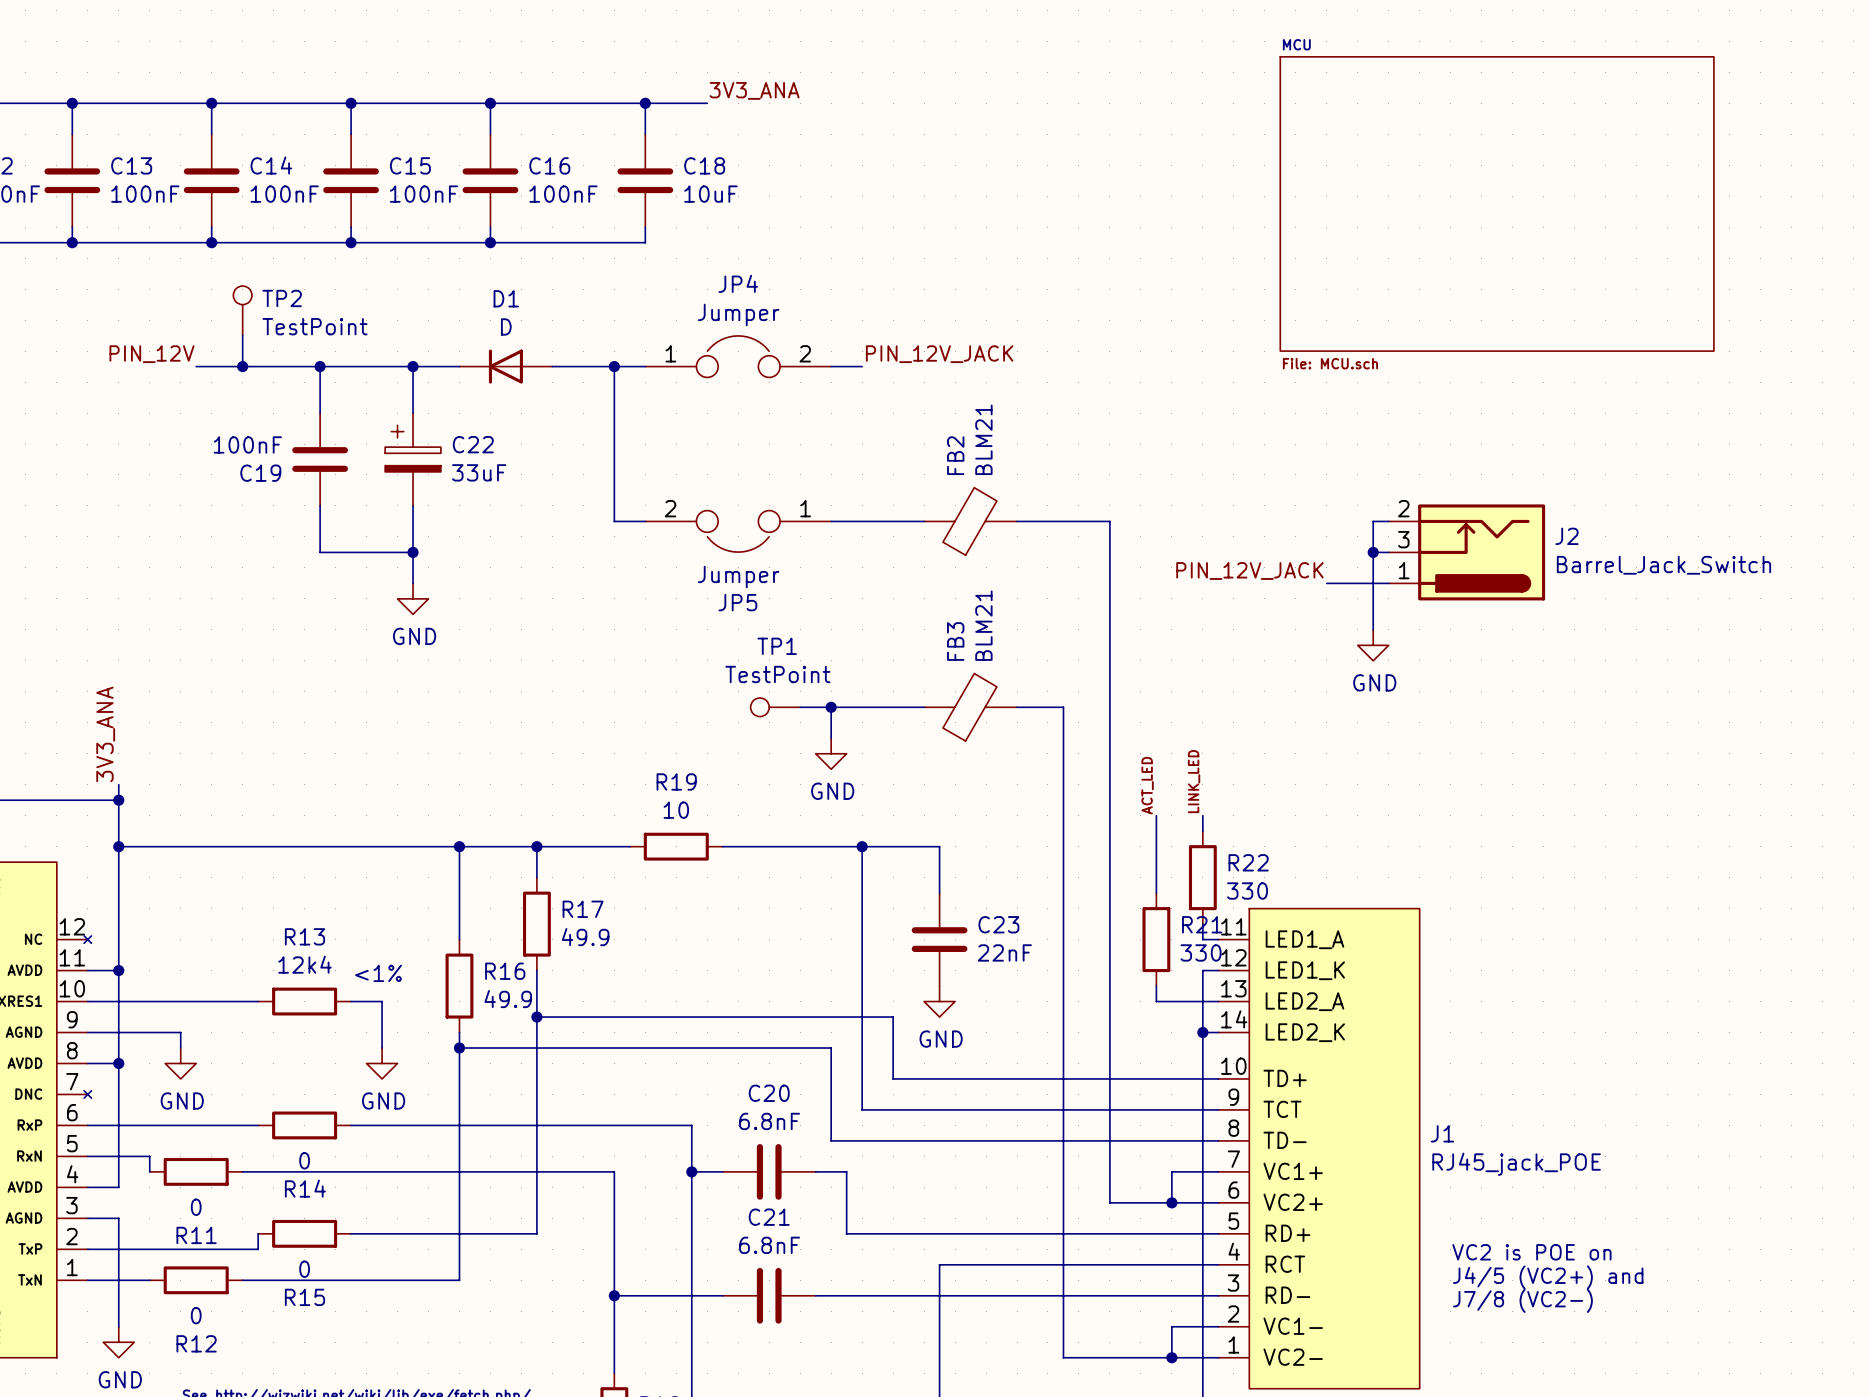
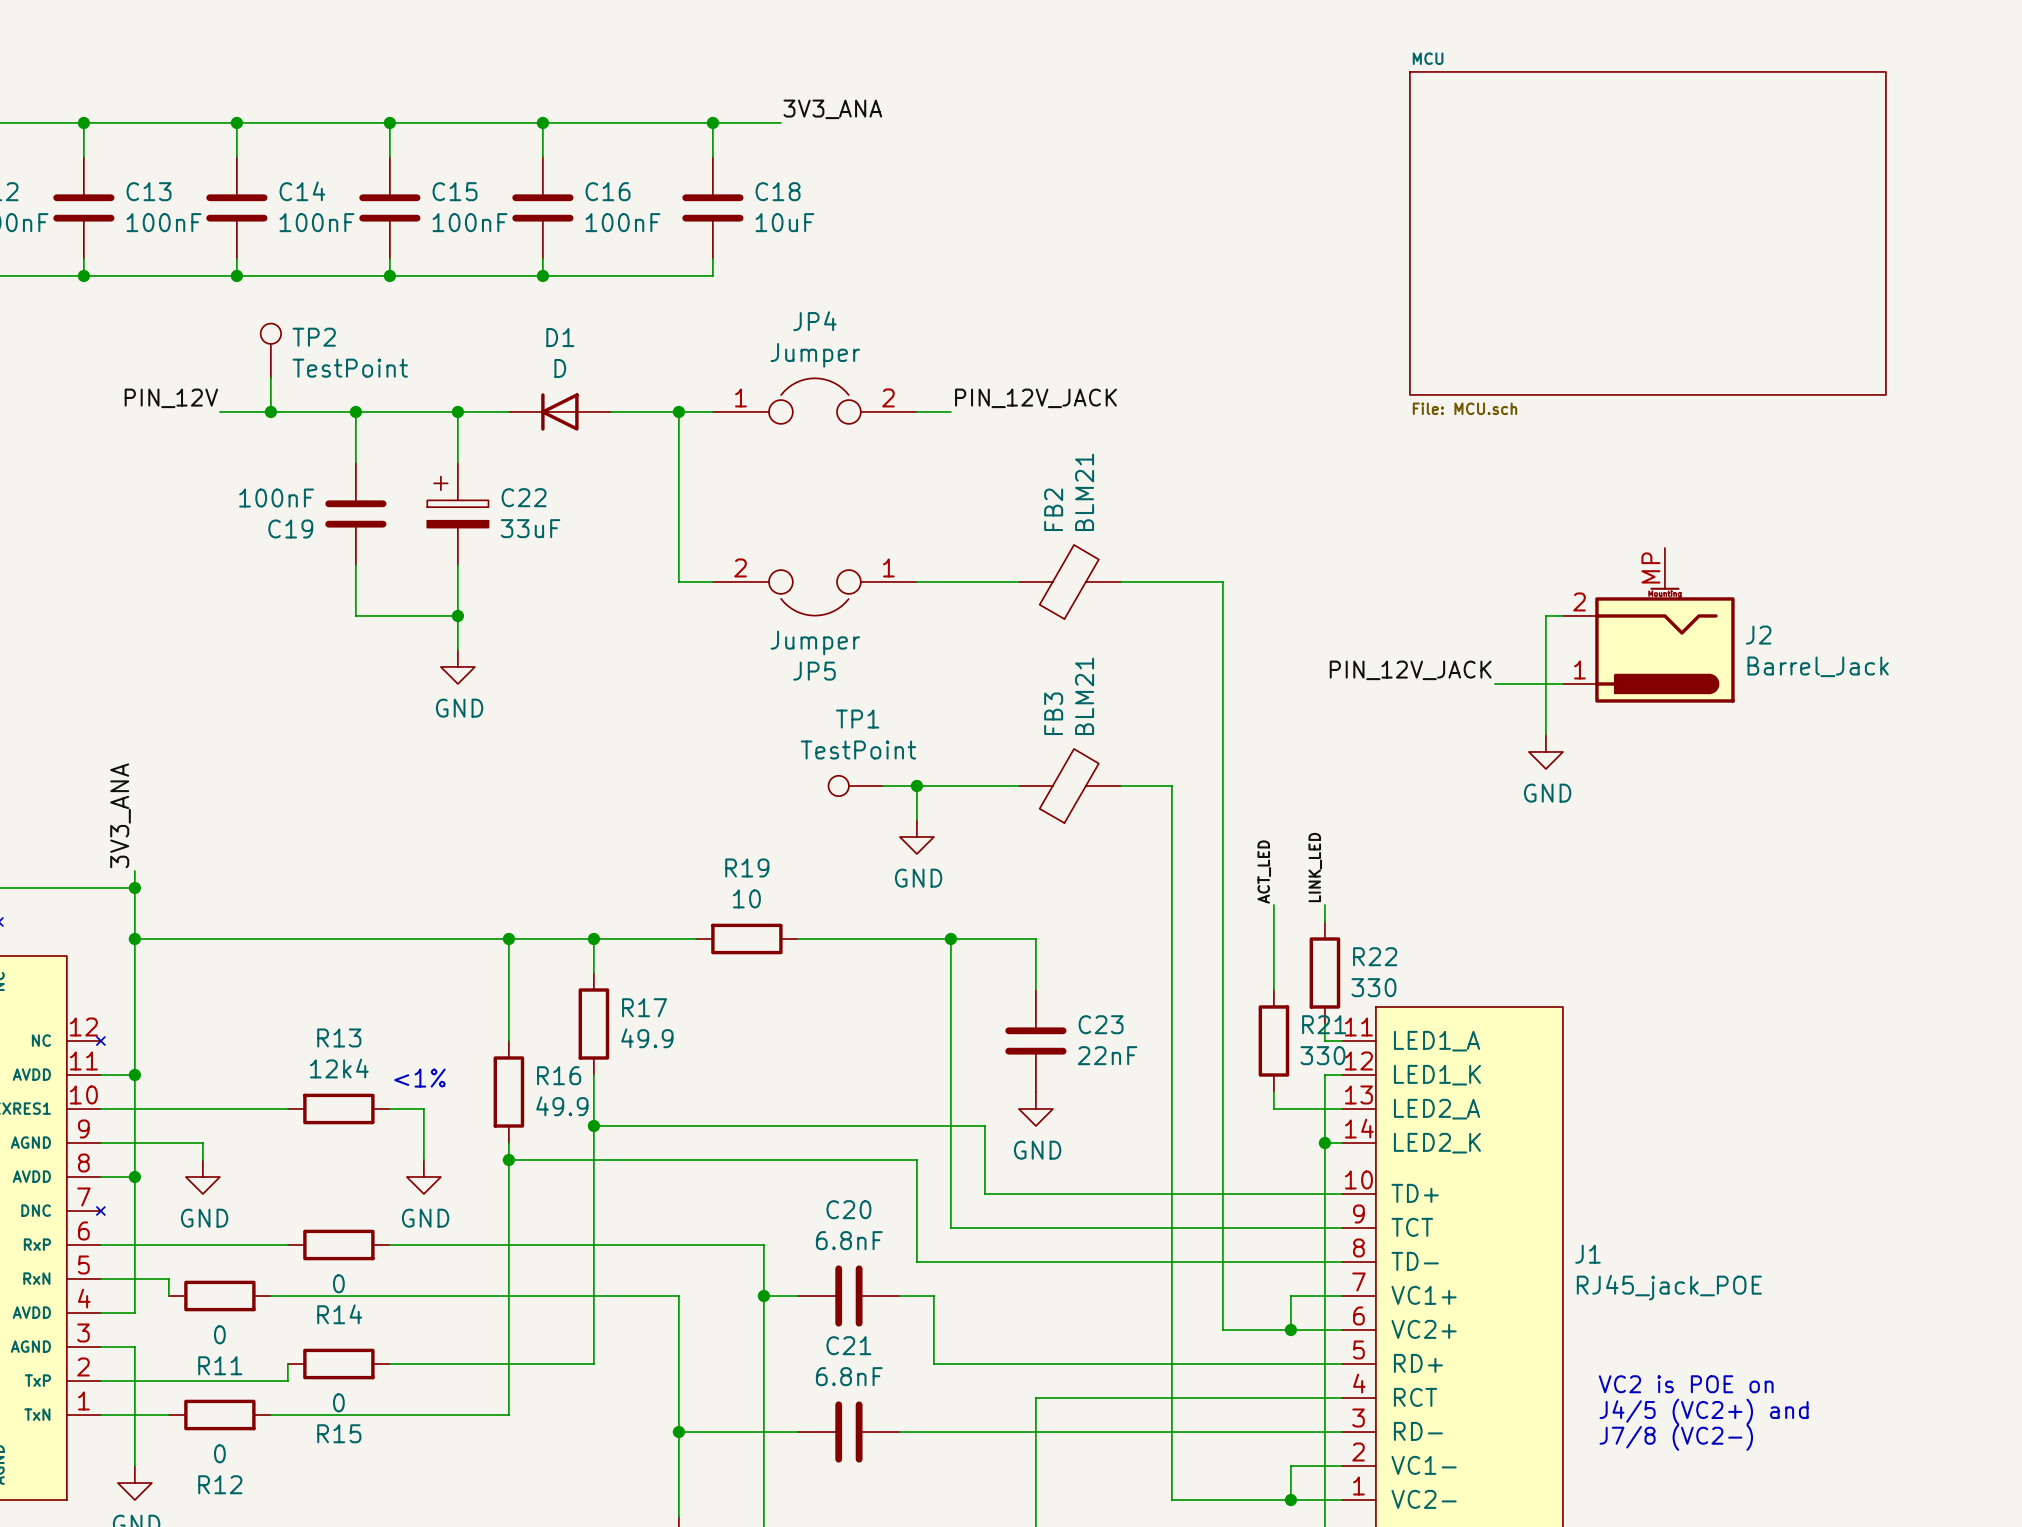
J2 symbol: [1388, 504, 1546, 601] -> [1562, 547, 1735, 703]
wire: (1388, 521) (1373, 521) (1373, 629) -> (1562, 615) (1545, 615) (1545, 734)
J2 name position: J2 (1566, 536) -> J2 (1758, 635)
wire: (1373, 552) (1388, 552) -> none
junction: (1373, 552) -> none
J2 value: Barrel_Jack_Switch (1663, 565) -> Barrel_Jack (1818, 666)
label position: PIN_12V_JACK (1249, 570) -> PIN_12V_JACK (1410, 670)
wire: (1326, 583) (1388, 583) -> (1494, 683) (1562, 683)
power symbol position: GND (1373, 645) -> GND (1545, 751)

